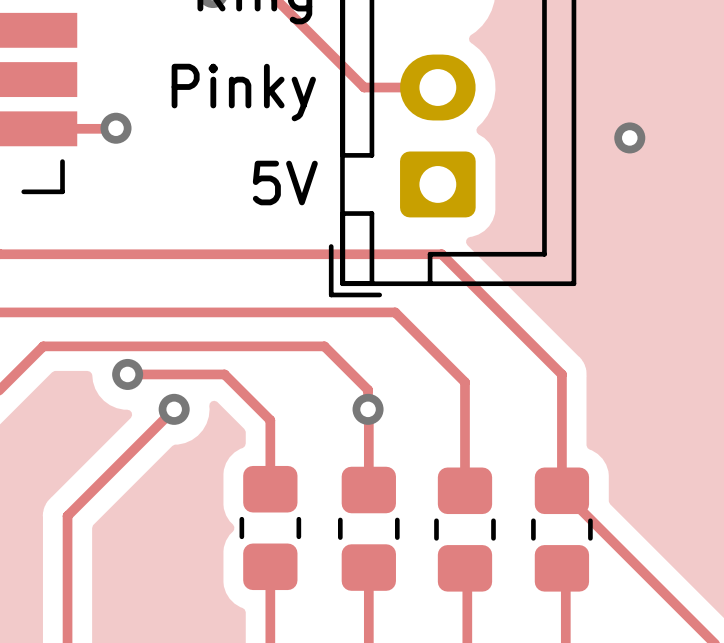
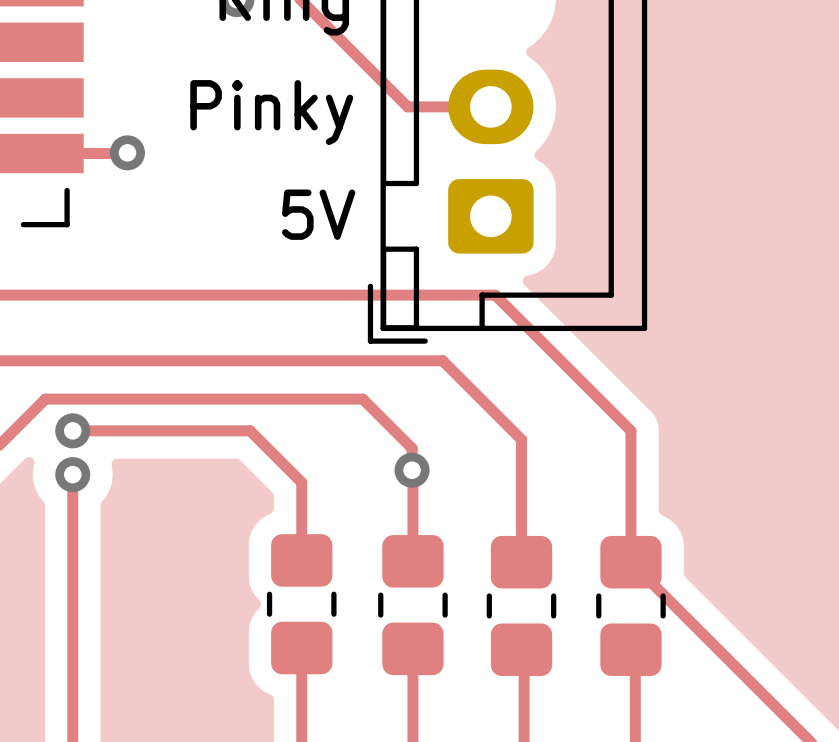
via: (629, 137) -> none
track: none -> (72, 430) (140, 430)
via: none -> (72, 430)
via: (127, 374) -> none
track: (174, 409) (67, 515) -> (72, 474) (72, 590)
via: (174, 409) -> none
via: none -> (72, 474)

